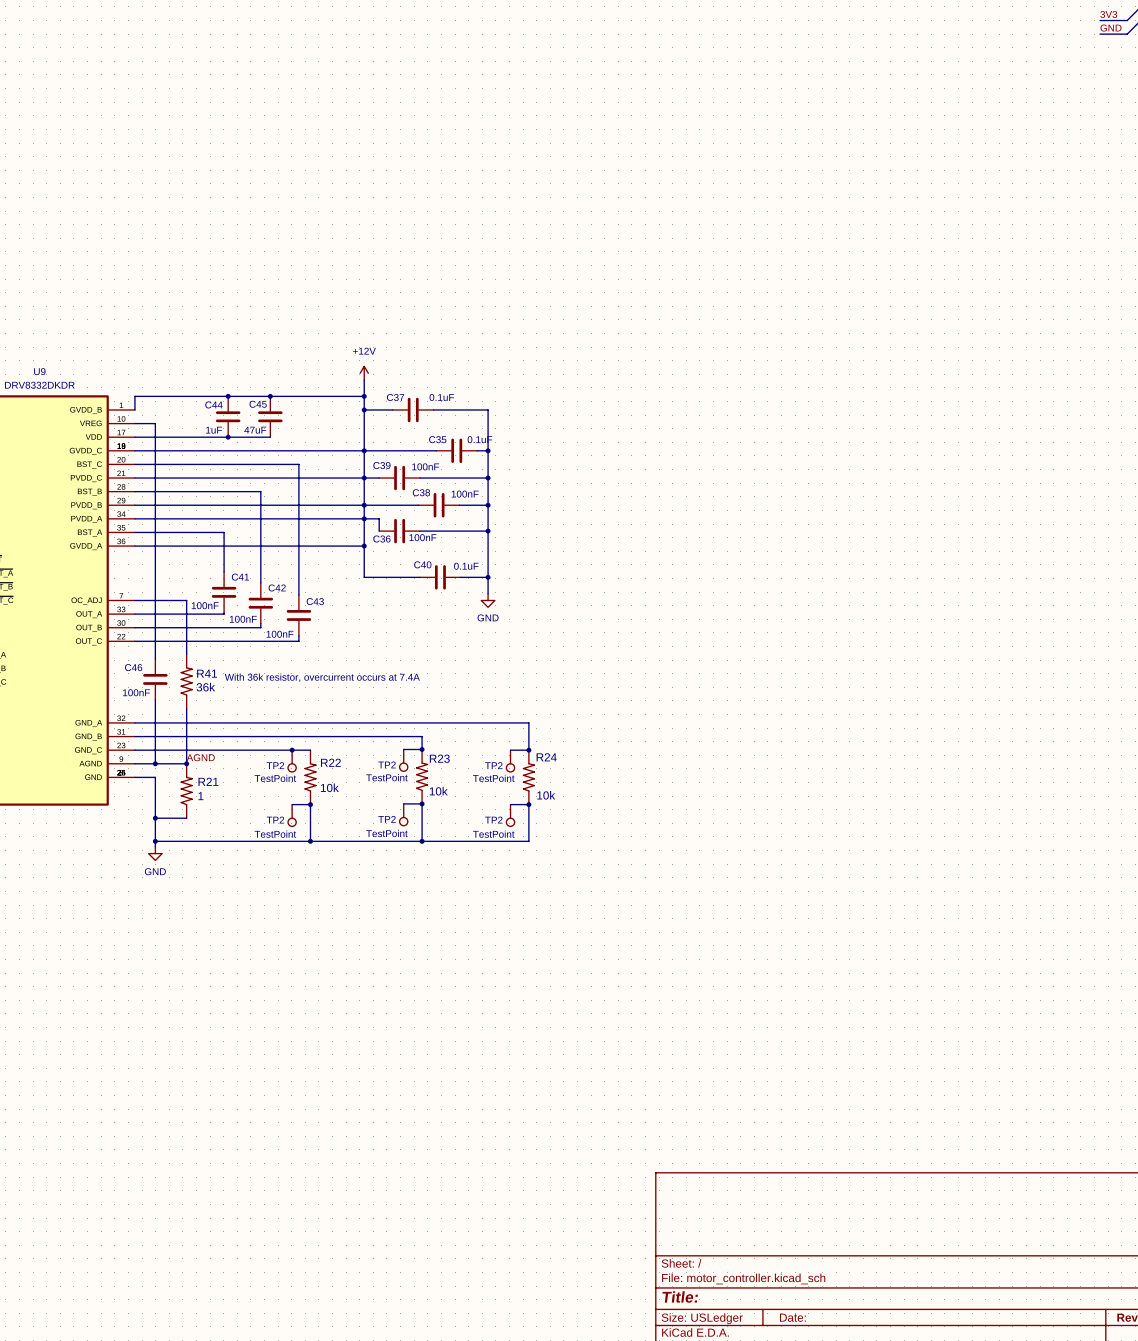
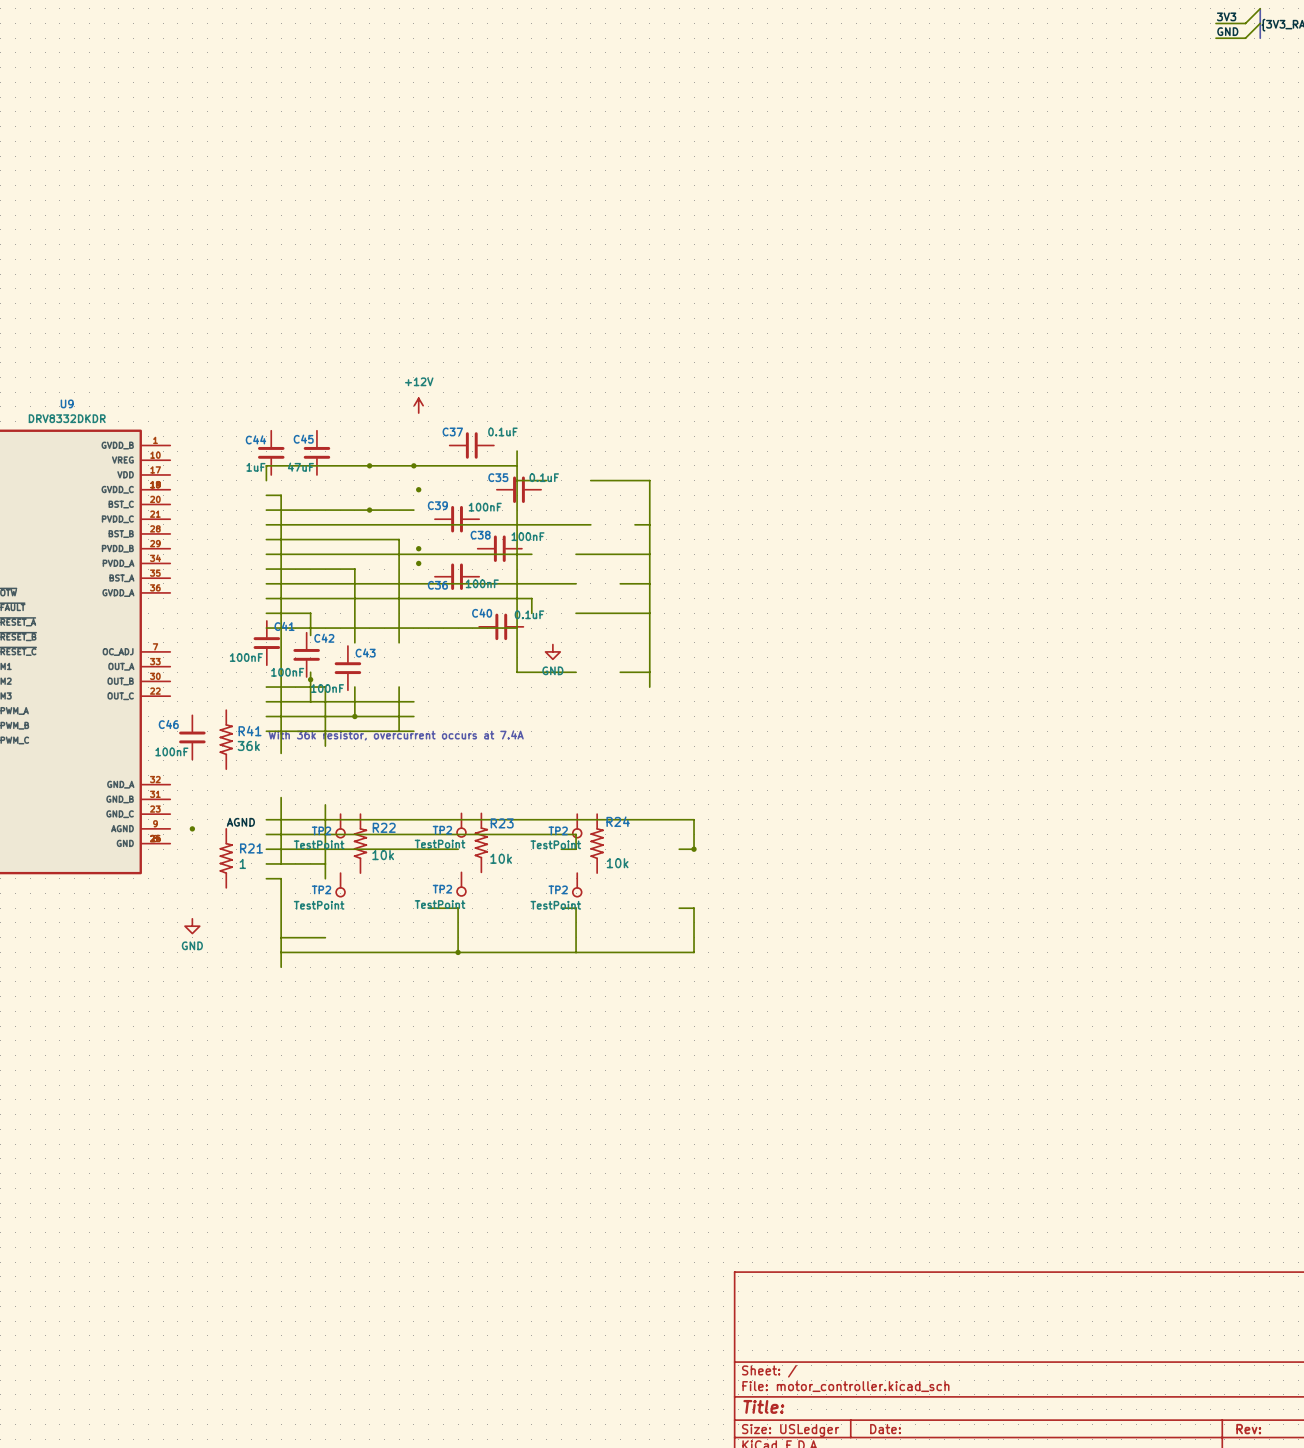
wire: (364, 380) (364, 577) (420, 577) -> none
junction: (228, 396) -> none
junction: (270, 396) -> none
wire: (364, 396) (134, 396) (134, 409) -> none
junction: (364, 396) -> none
wire: (364, 409) (392, 409) -> none
junction: (364, 409) -> none
wire: (433, 409) (488, 409) (488, 593) -> none
wire: none -> (517, 451) (517, 672) (576, 672)
wire: (134, 423) (155, 423) (155, 659) -> none
junction: none -> (369, 465)
junction: none -> (413, 465)
wire: none -> (517, 465) (266, 465) (266, 480)
wire: (134, 437) (270, 437) -> none
junction: (228, 437) -> none
wire: none -> (517, 480) (546, 480)
wire: none -> (590, 480) (649, 480) (649, 687)
wire: (134, 450) (436, 450) -> none
wire: (477, 450) (488, 450) -> none
junction: (488, 450) -> none
wire: none -> (266, 495) (281, 495) (281, 753)
wire: (134, 464) (298, 464) (298, 595) -> none
wire: none -> (266, 510) (413, 510)
junction: none -> (369, 510)
wire: (134, 478) (379, 478) -> none
junction: (364, 478) -> none
wire: (420, 478) (488, 478) -> (576, 613) (649, 613)
junction: (488, 478) -> none
wire: none -> (266, 524) (590, 524)
wire: none -> (635, 524) (649, 524)
wire: (134, 491) (260, 491) (260, 582) -> none
wire: none -> (266, 539) (399, 539) (399, 642)
wire: (134, 505) (418, 505) -> none
wire: (459, 505) (488, 505) -> none
junction: (488, 505) -> none
wire: none -> (266, 554) (531, 554)
wire: (134, 518) (379, 518) (379, 531) -> none
wire: none -> (266, 569) (354, 569) (354, 642)
wire: (420, 531) (488, 531) -> (576, 554) (649, 554)
junction: (488, 531) -> none
wire: (134, 532) (224, 532) (224, 571) -> none
wire: none -> (266, 583) (576, 583)
wire: (134, 546) (364, 546) -> none
junction: (364, 546) -> none
wire: none -> (266, 598) (531, 598) (531, 613)
wire: none -> (266, 613) (310, 613) (310, 635)
wire: (460, 577) (488, 577) -> (620, 583) (649, 583)
junction: (488, 577) -> none
wire: none -> (266, 628) (517, 628)
wire: (134, 600) (186, 600) (186, 654) -> none
wire: (224, 612) (134, 614) -> none
wire: none -> (310, 672) (310, 701)
wire: none -> (620, 672) (649, 672)
wire: (260, 623) (260, 627) (134, 627) -> none
junction: none -> (310, 679)
wire: none -> (266, 687) (325, 687) (325, 746)
wire: none -> (354, 687) (354, 716)
wire: none -> (399, 687) (399, 731)
wire: (298, 635) (298, 641) (134, 641) -> none
wire: none -> (266, 701) (413, 701)
wire: none -> (266, 716) (413, 716)
junction: none -> (354, 716)
wire: none -> (266, 731) (413, 731)
wire: (155, 699) (155, 763) -> none
wire: (186, 708) (186, 765) -> none
wire: (134, 722) (528, 722) (528, 750) (510, 750) -> none
wire: none -> (281, 797) (281, 863)
wire: (134, 736) (422, 736) (422, 749) (403, 749) -> none
wire: none -> (325, 804) (325, 878)
junction: (422, 749) -> none
wire: (134, 750) (310, 750) -> none
junction: (292, 750) -> none
junction: (528, 750) -> none
wire: none -> (266, 819) (694, 819) (694, 849) (679, 849)
wire: (134, 763) (186, 763) -> none
junction: (186, 763) -> none
wire: none -> (266, 834) (576, 834) (576, 849) (561, 849)
wire: (134, 777) (155, 777) (155, 846) -> none
wire: none -> (266, 849) (458, 849)
junction: none -> (694, 849)
wire: none -> (266, 863) (325, 863)
wire: (403, 803) (422, 803) (422, 841) -> none
junction: (422, 803) -> none
wire: (292, 804) (310, 804) (310, 841) -> none
junction: (310, 804) -> none
wire: (510, 804) (528, 804) (528, 841) (155, 841) -> none
junction: (528, 804) -> none
wire: none -> (266, 878) (281, 878) (281, 967)
wire: (155, 818) (186, 818) -> none
junction: (155, 818) -> none
wire: none -> (428, 908) (458, 908) (458, 952)
wire: none -> (561, 908) (576, 908) (576, 952)
wire: none -> (679, 908) (694, 908) (694, 952) (281, 952)
junction: (155, 841) -> none
junction: (310, 841) -> none
junction: (422, 841) -> none
wire: none -> (281, 937) (325, 937)
junction: none -> (458, 952)

